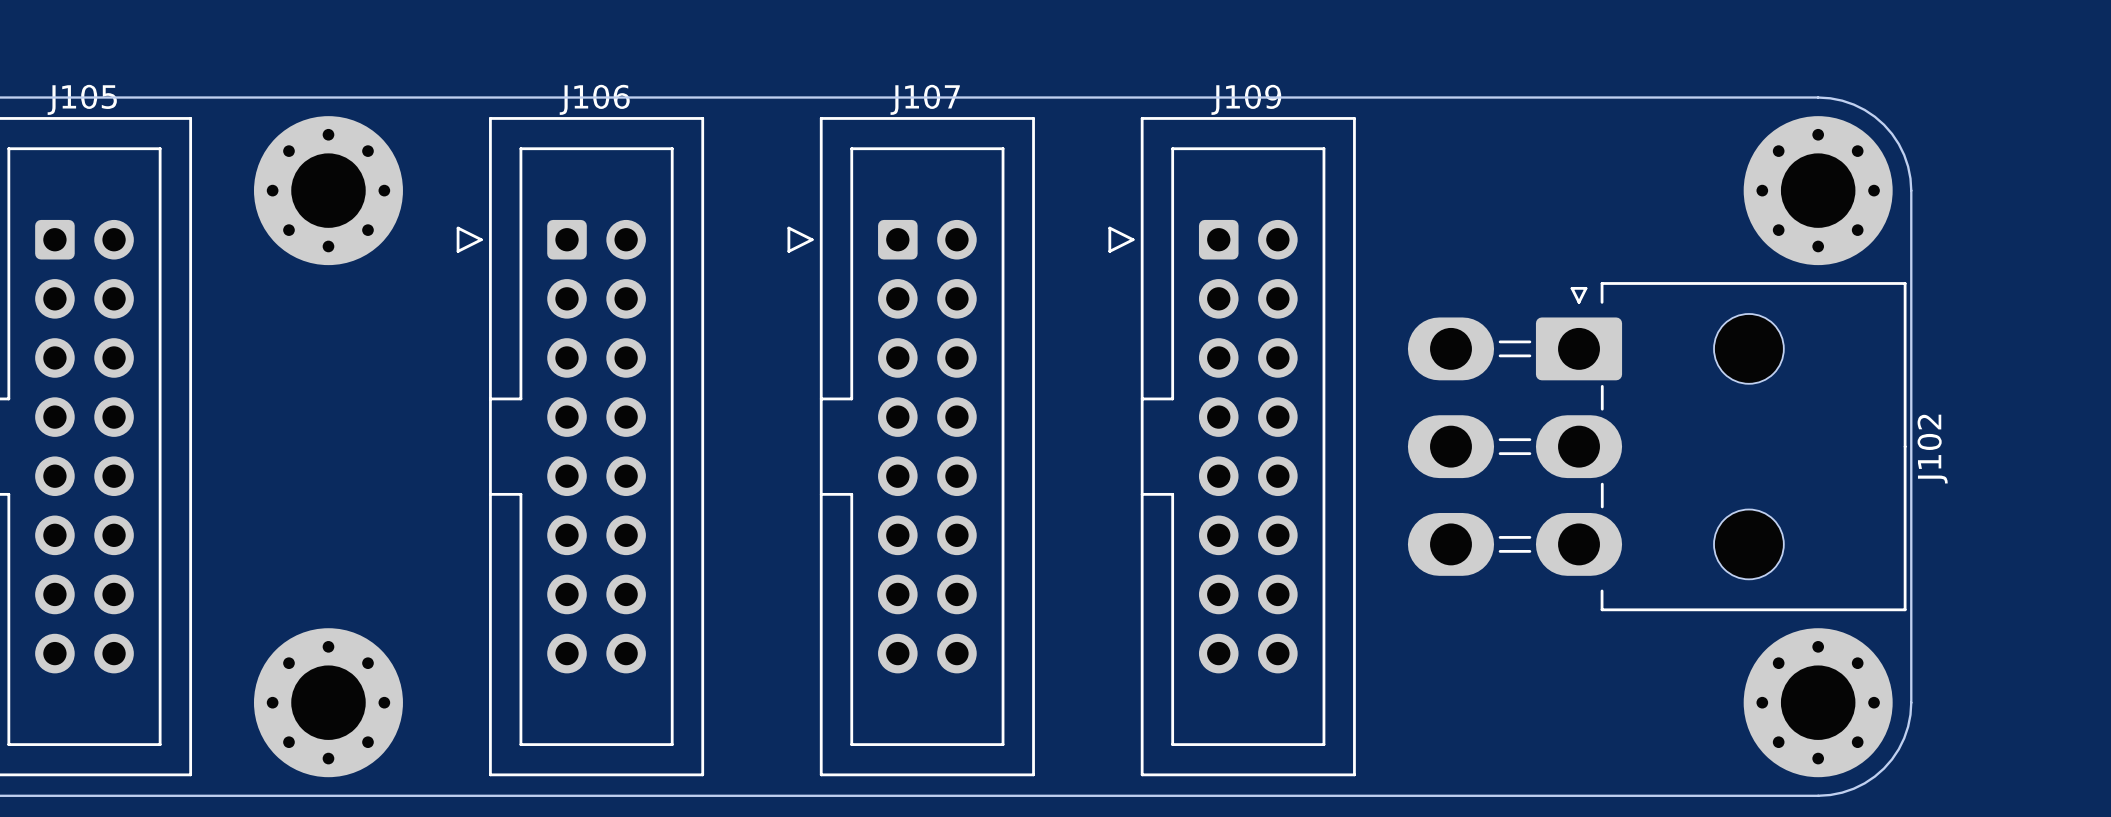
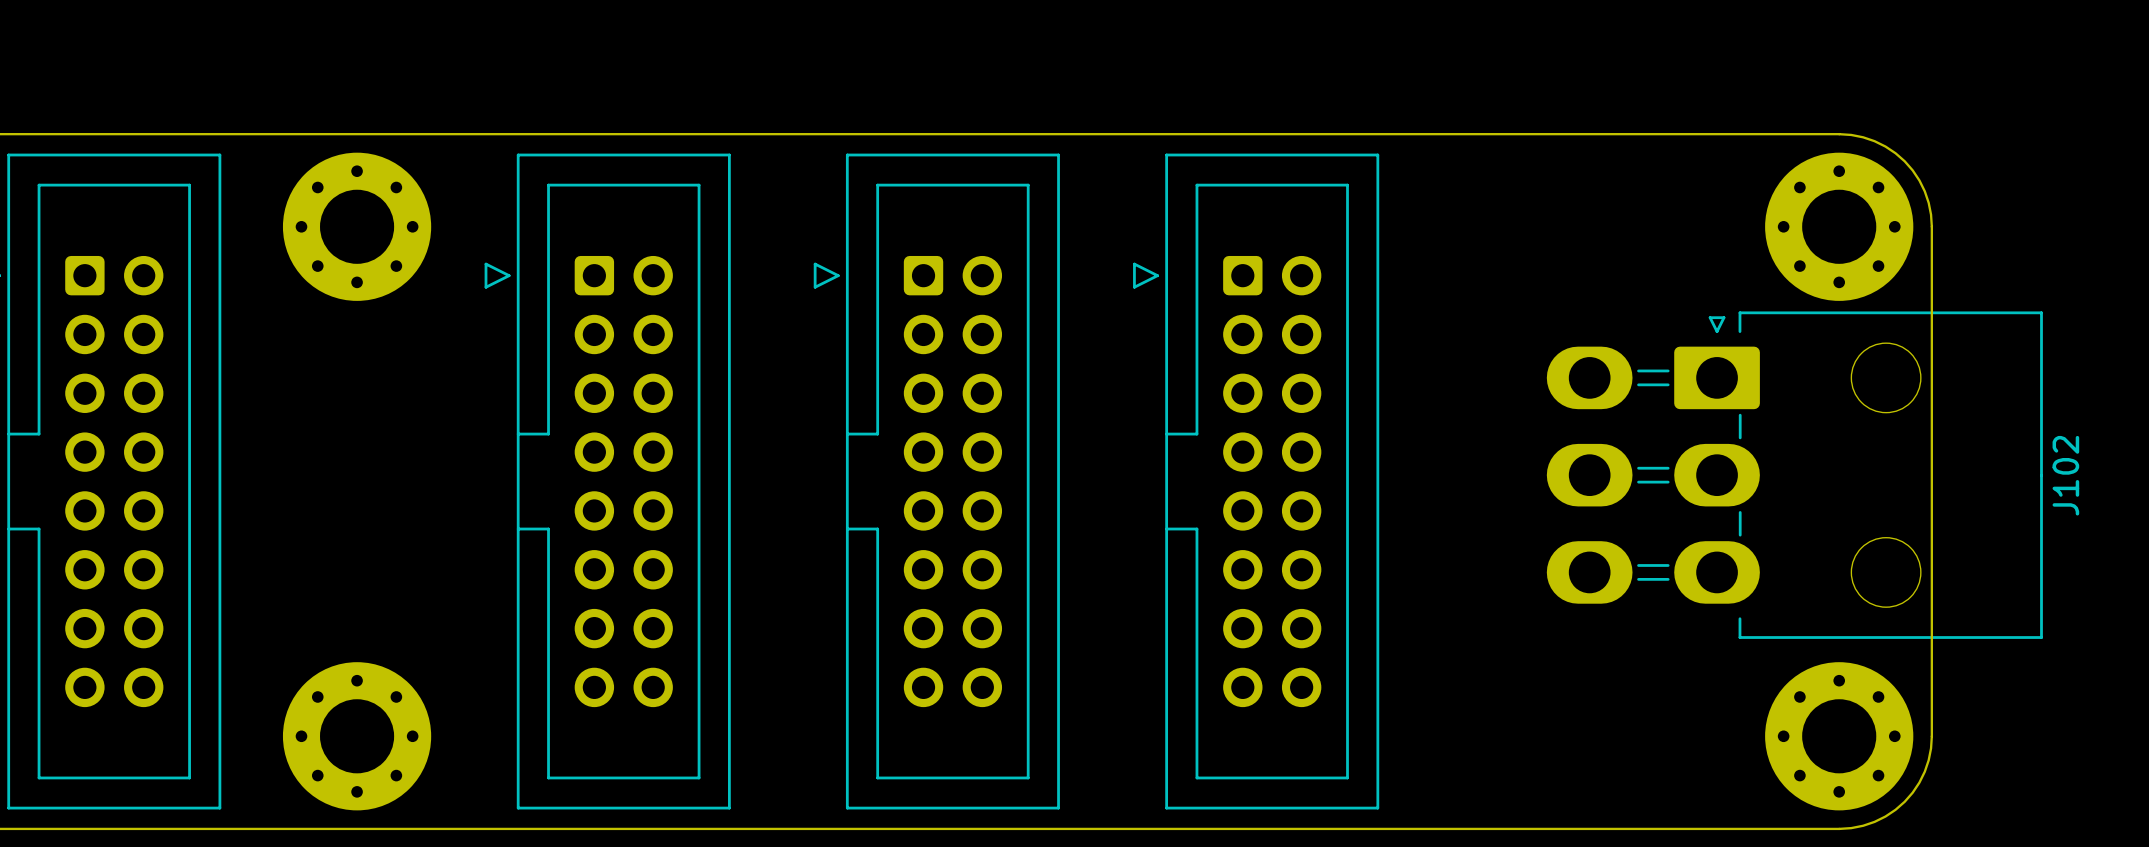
J105 name: J105 (82, 99) -> none
J106 name: J106 (594, 99) -> none
J107 name: J107 (925, 99) -> none
J109 name: J109 (1246, 99) -> none
J102 position: (1657, 446) -> (1794, 475)

